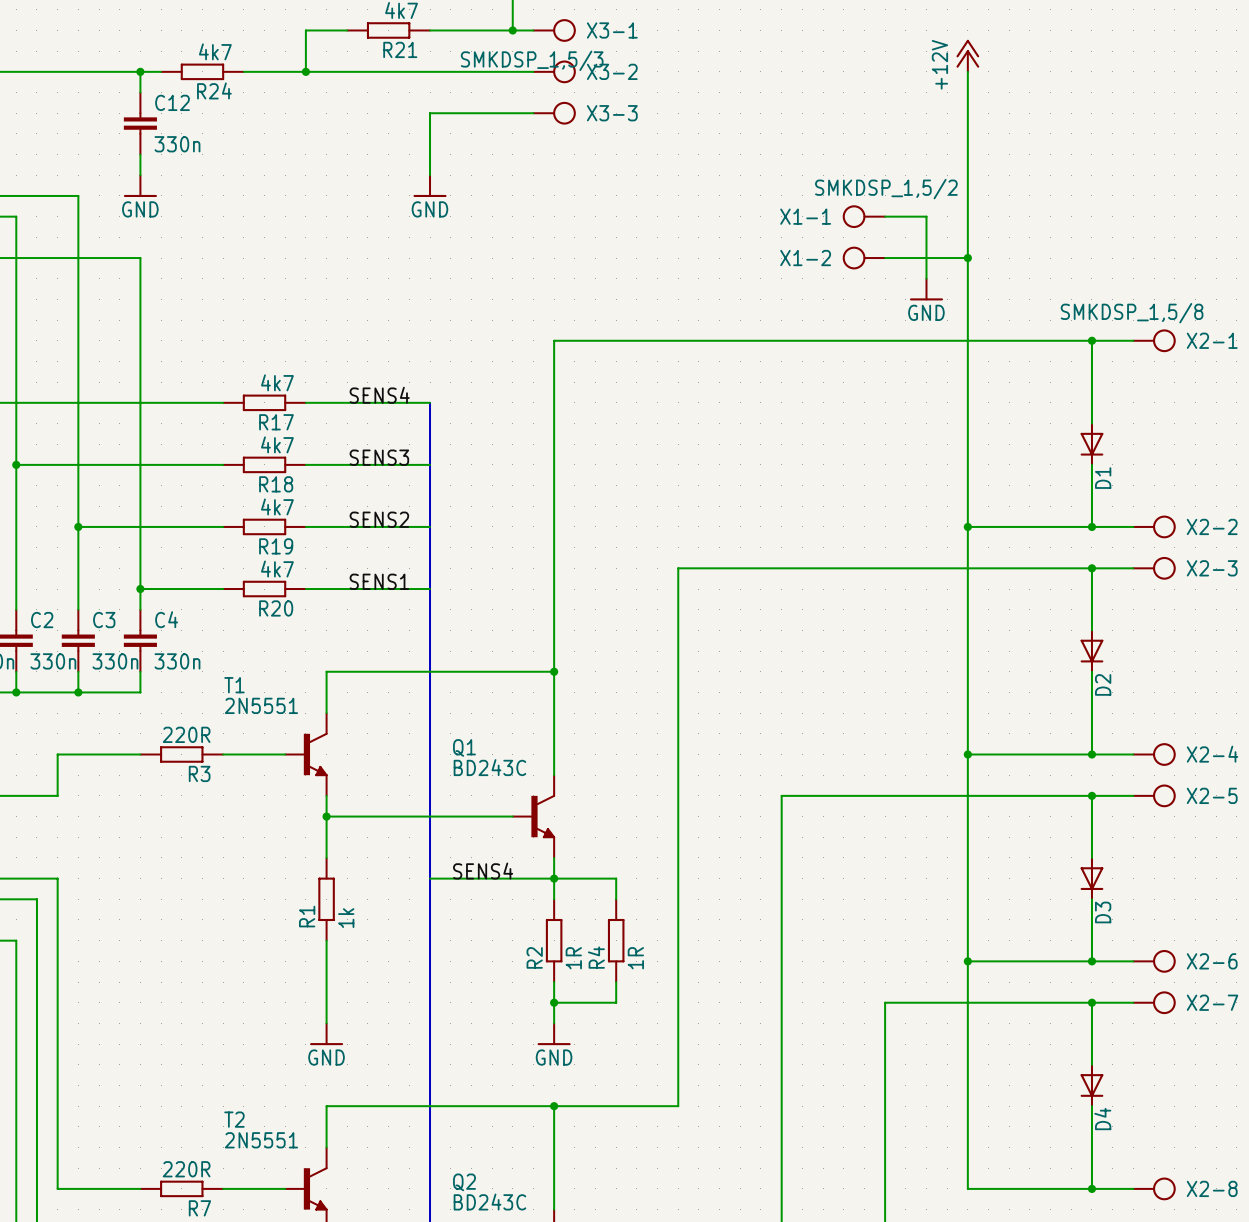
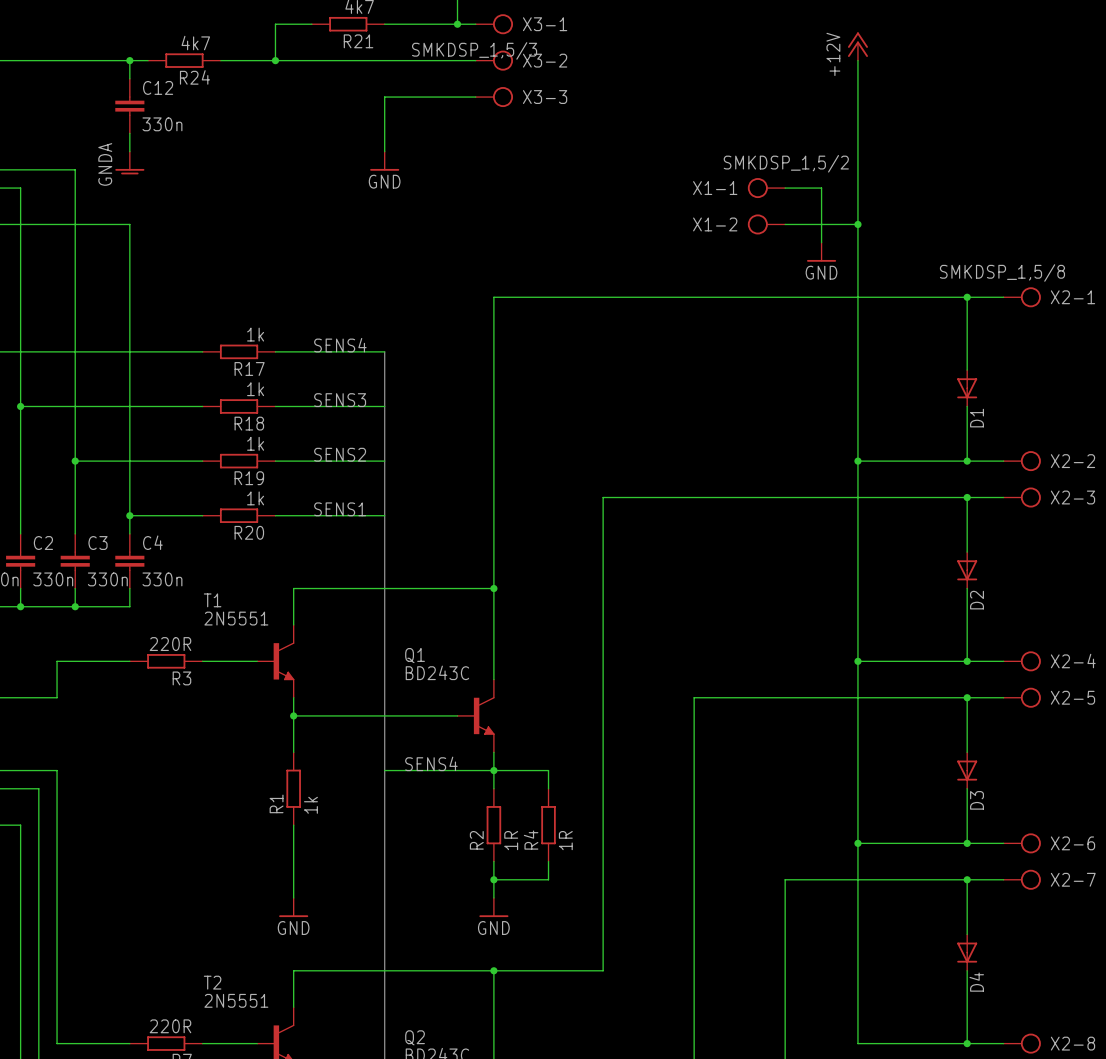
power symbol: GND (140, 186) -> GNDA (129, 163)
R17 value: 4k7 (277, 382) -> 1k (255, 334)
R18 value: 4k7 (277, 444) -> 1k (255, 389)
R19 value: 4k7 (277, 506) -> 1k (255, 443)
R20 value: 4k7 (277, 569) -> 1k (255, 498)

